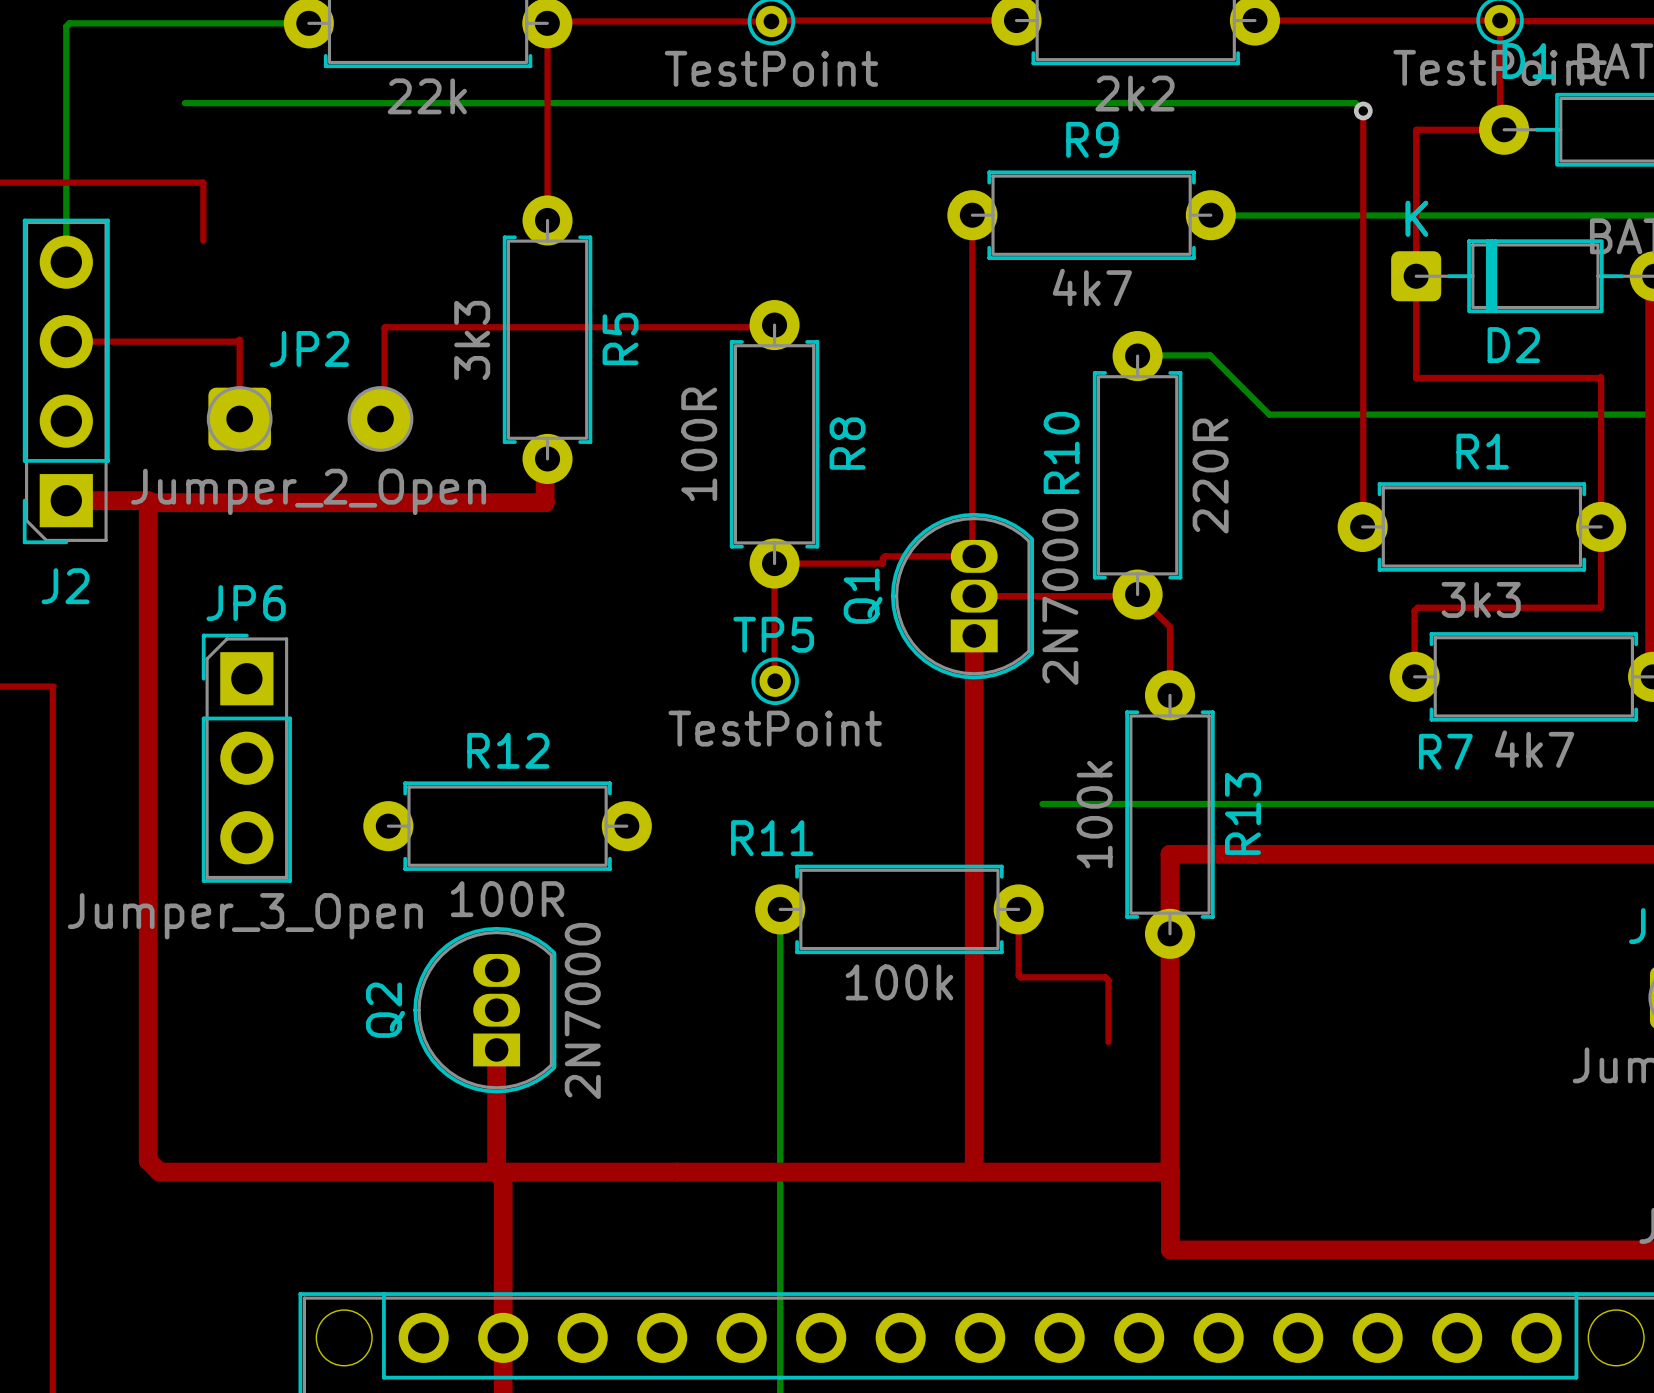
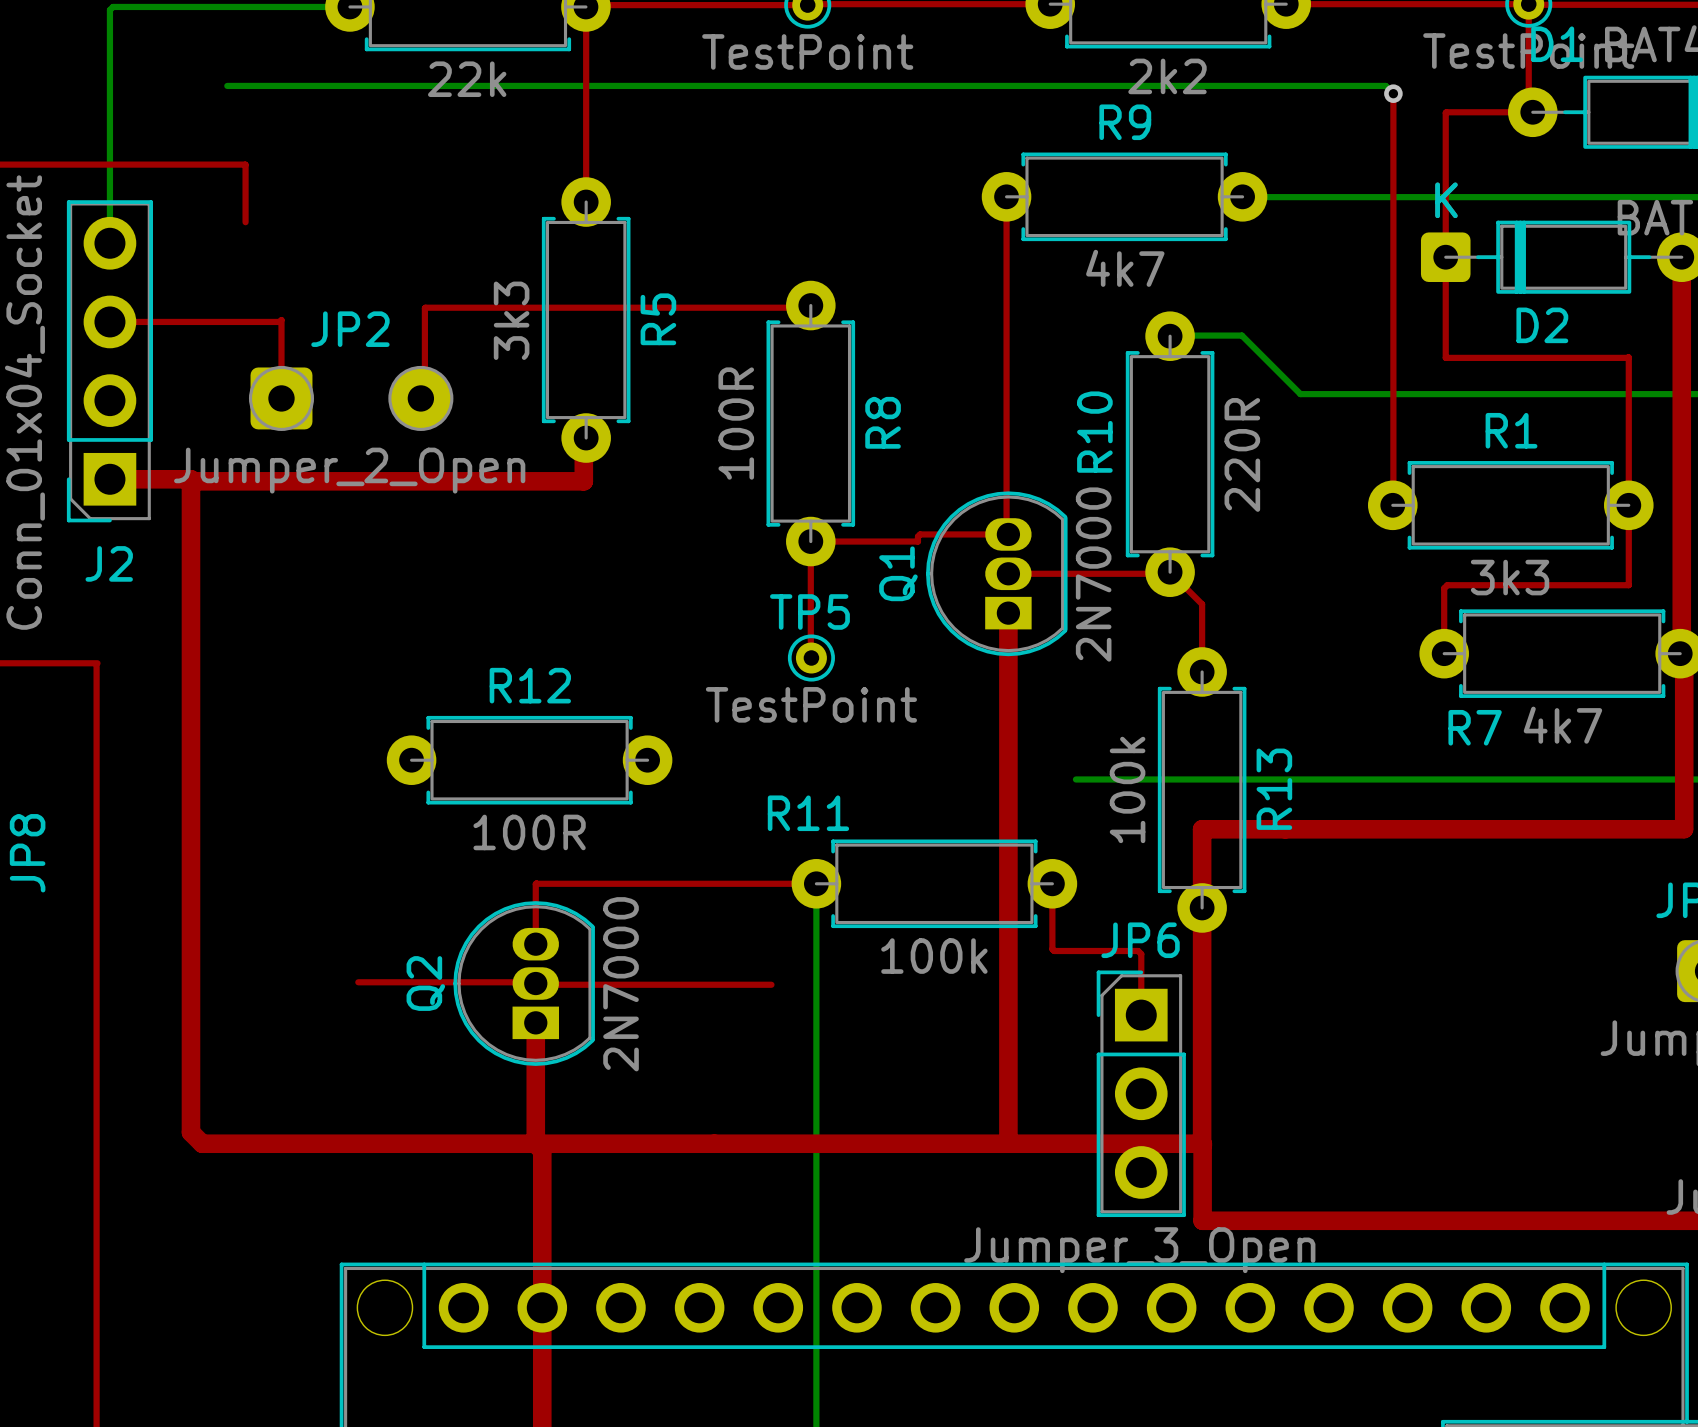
JP6 position: (246, 758) -> (1141, 1093)
R12 position: (507, 826) -> (529, 760)
top track: none -> (536, 883) (535, 944)
top track: none -> (536, 883) (816, 883)
top track: none -> (358, 982) (534, 982)
top track: none -> (537, 984) (771, 984)

